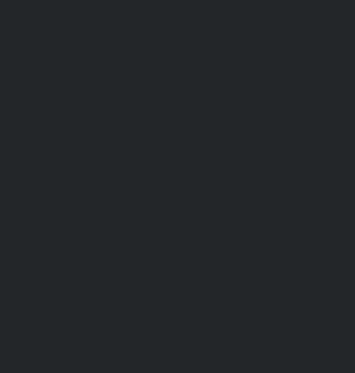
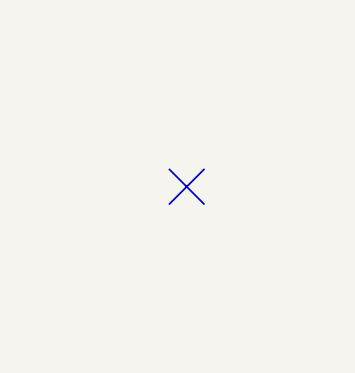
no-connect mark: none -> (186, 186)

